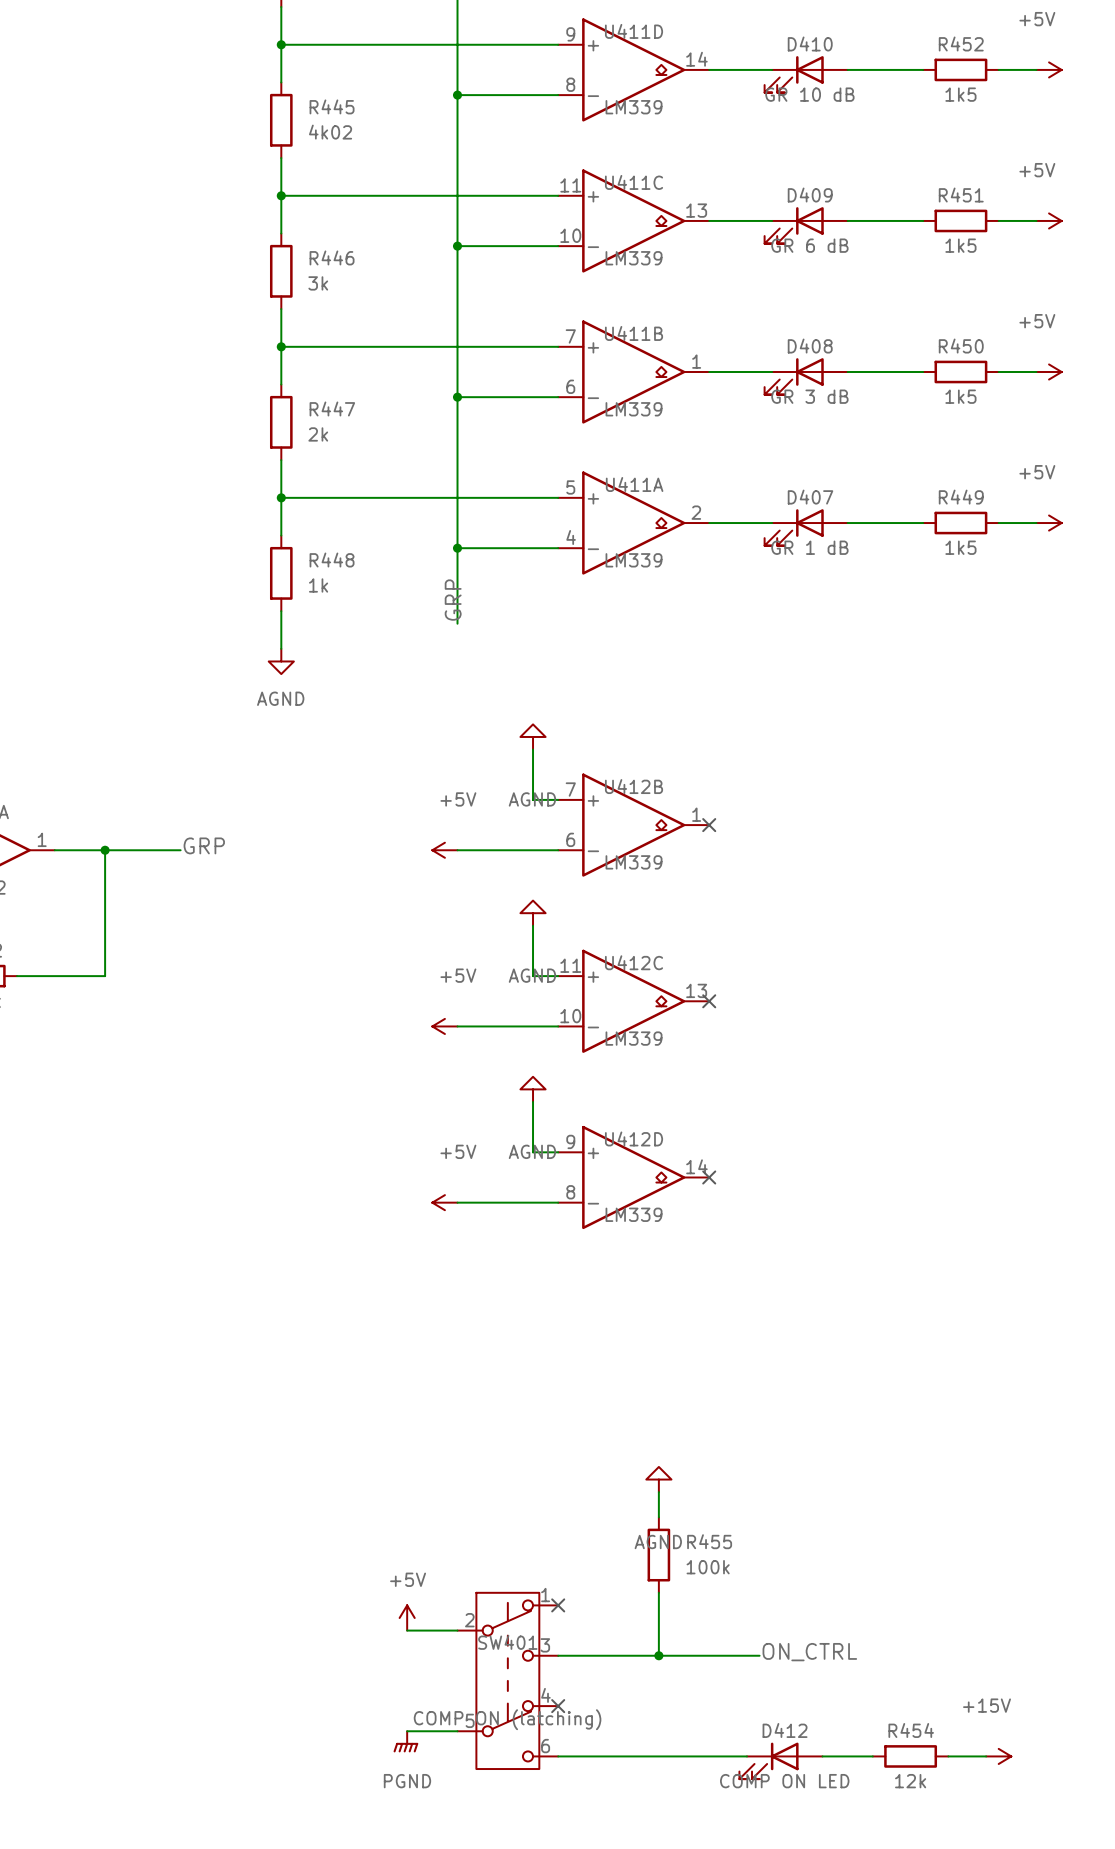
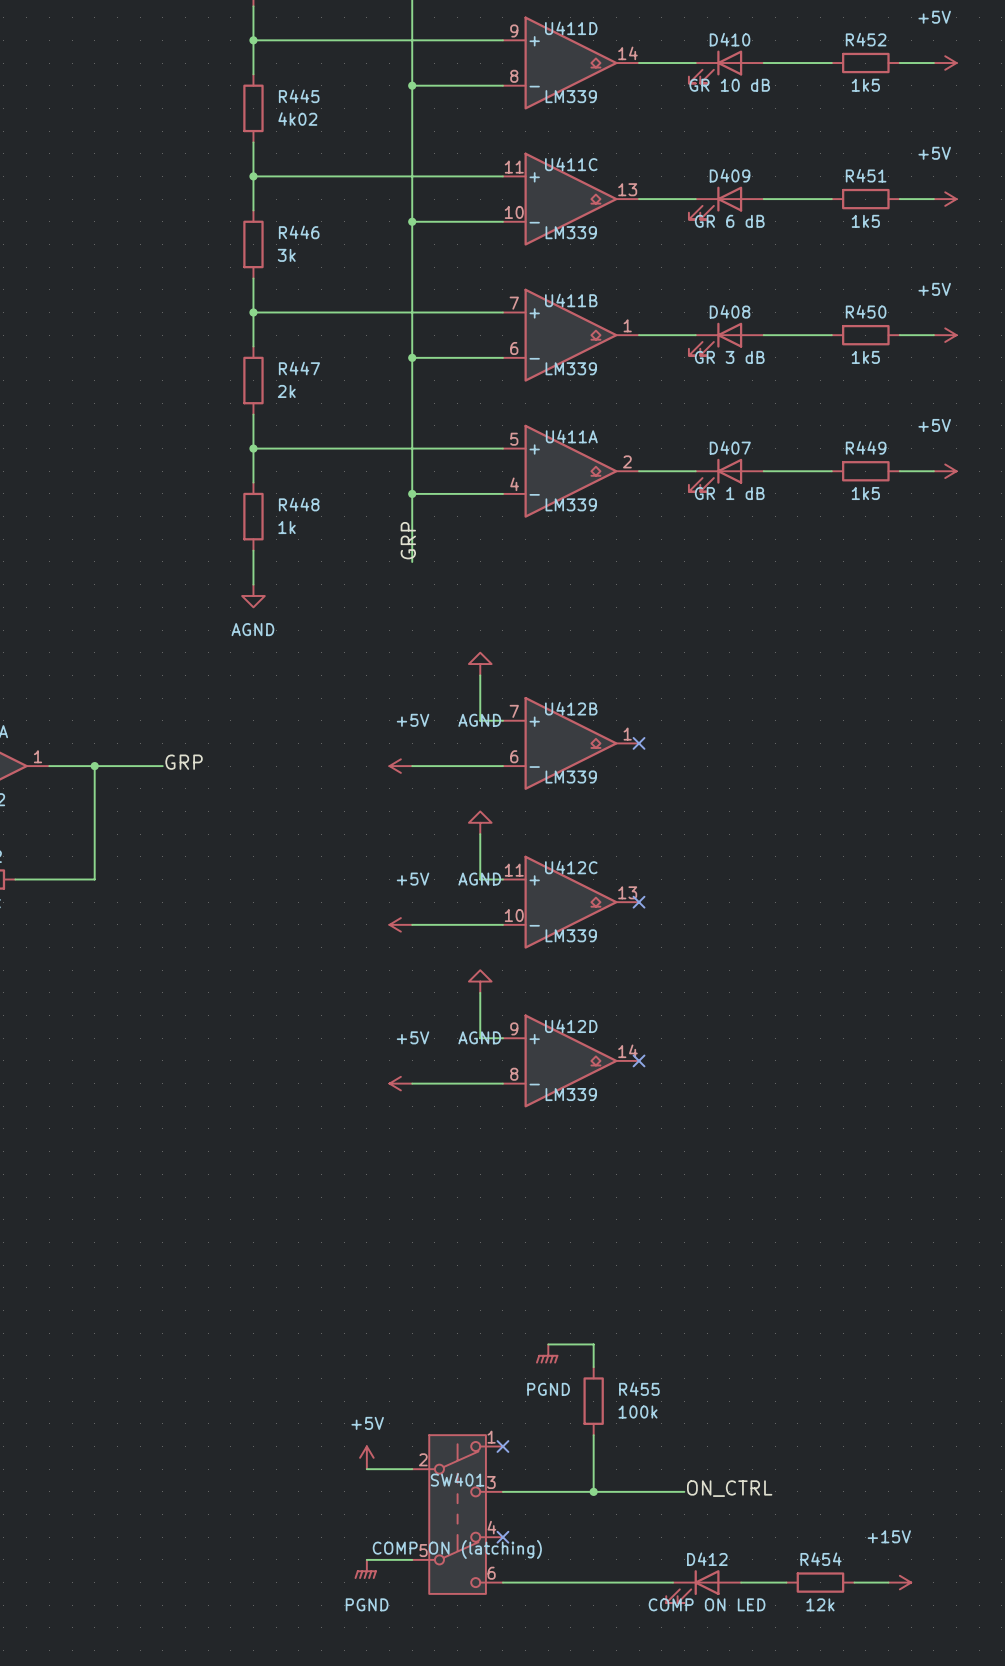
power symbol: AGND (658, 1479) -> none
wire: none -> (548, 1344) (593, 1344)
power symbol: none -> PGND (547, 1353)

